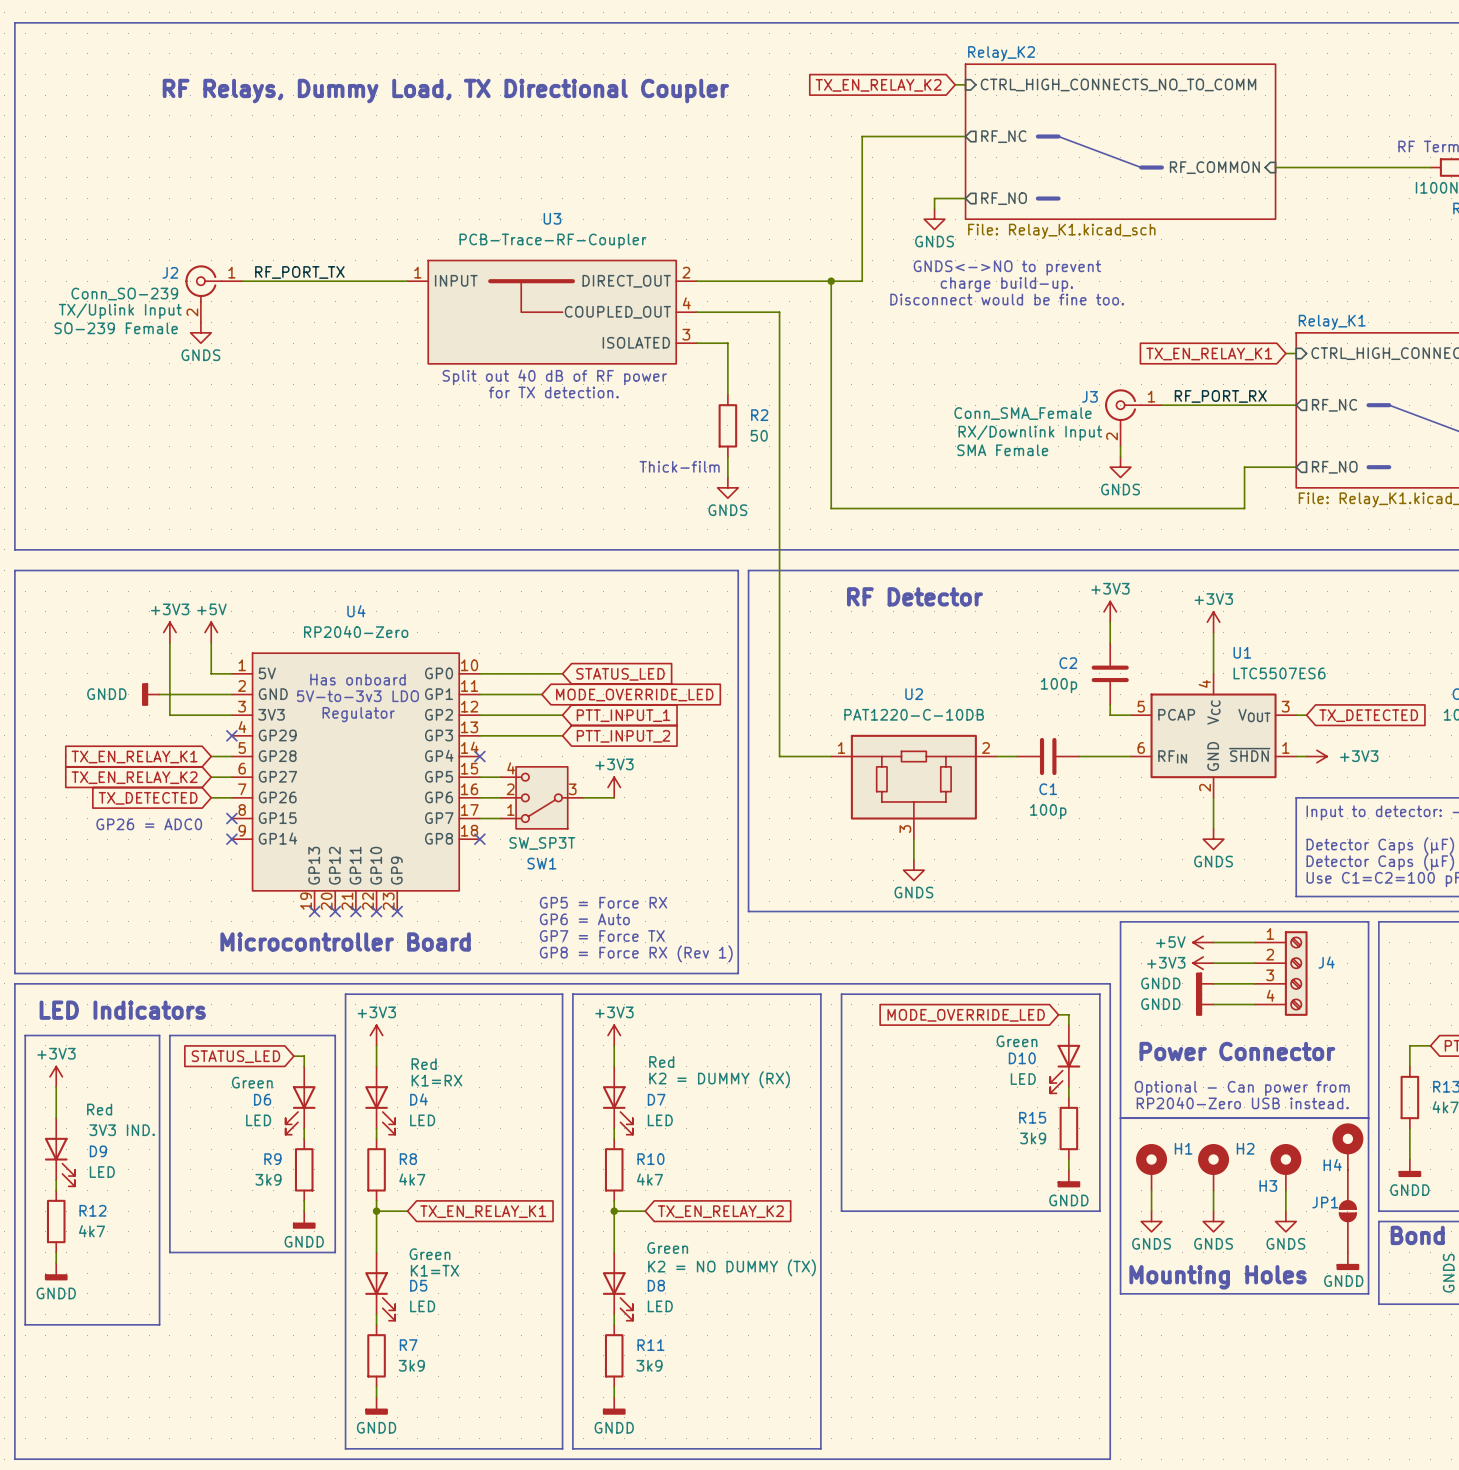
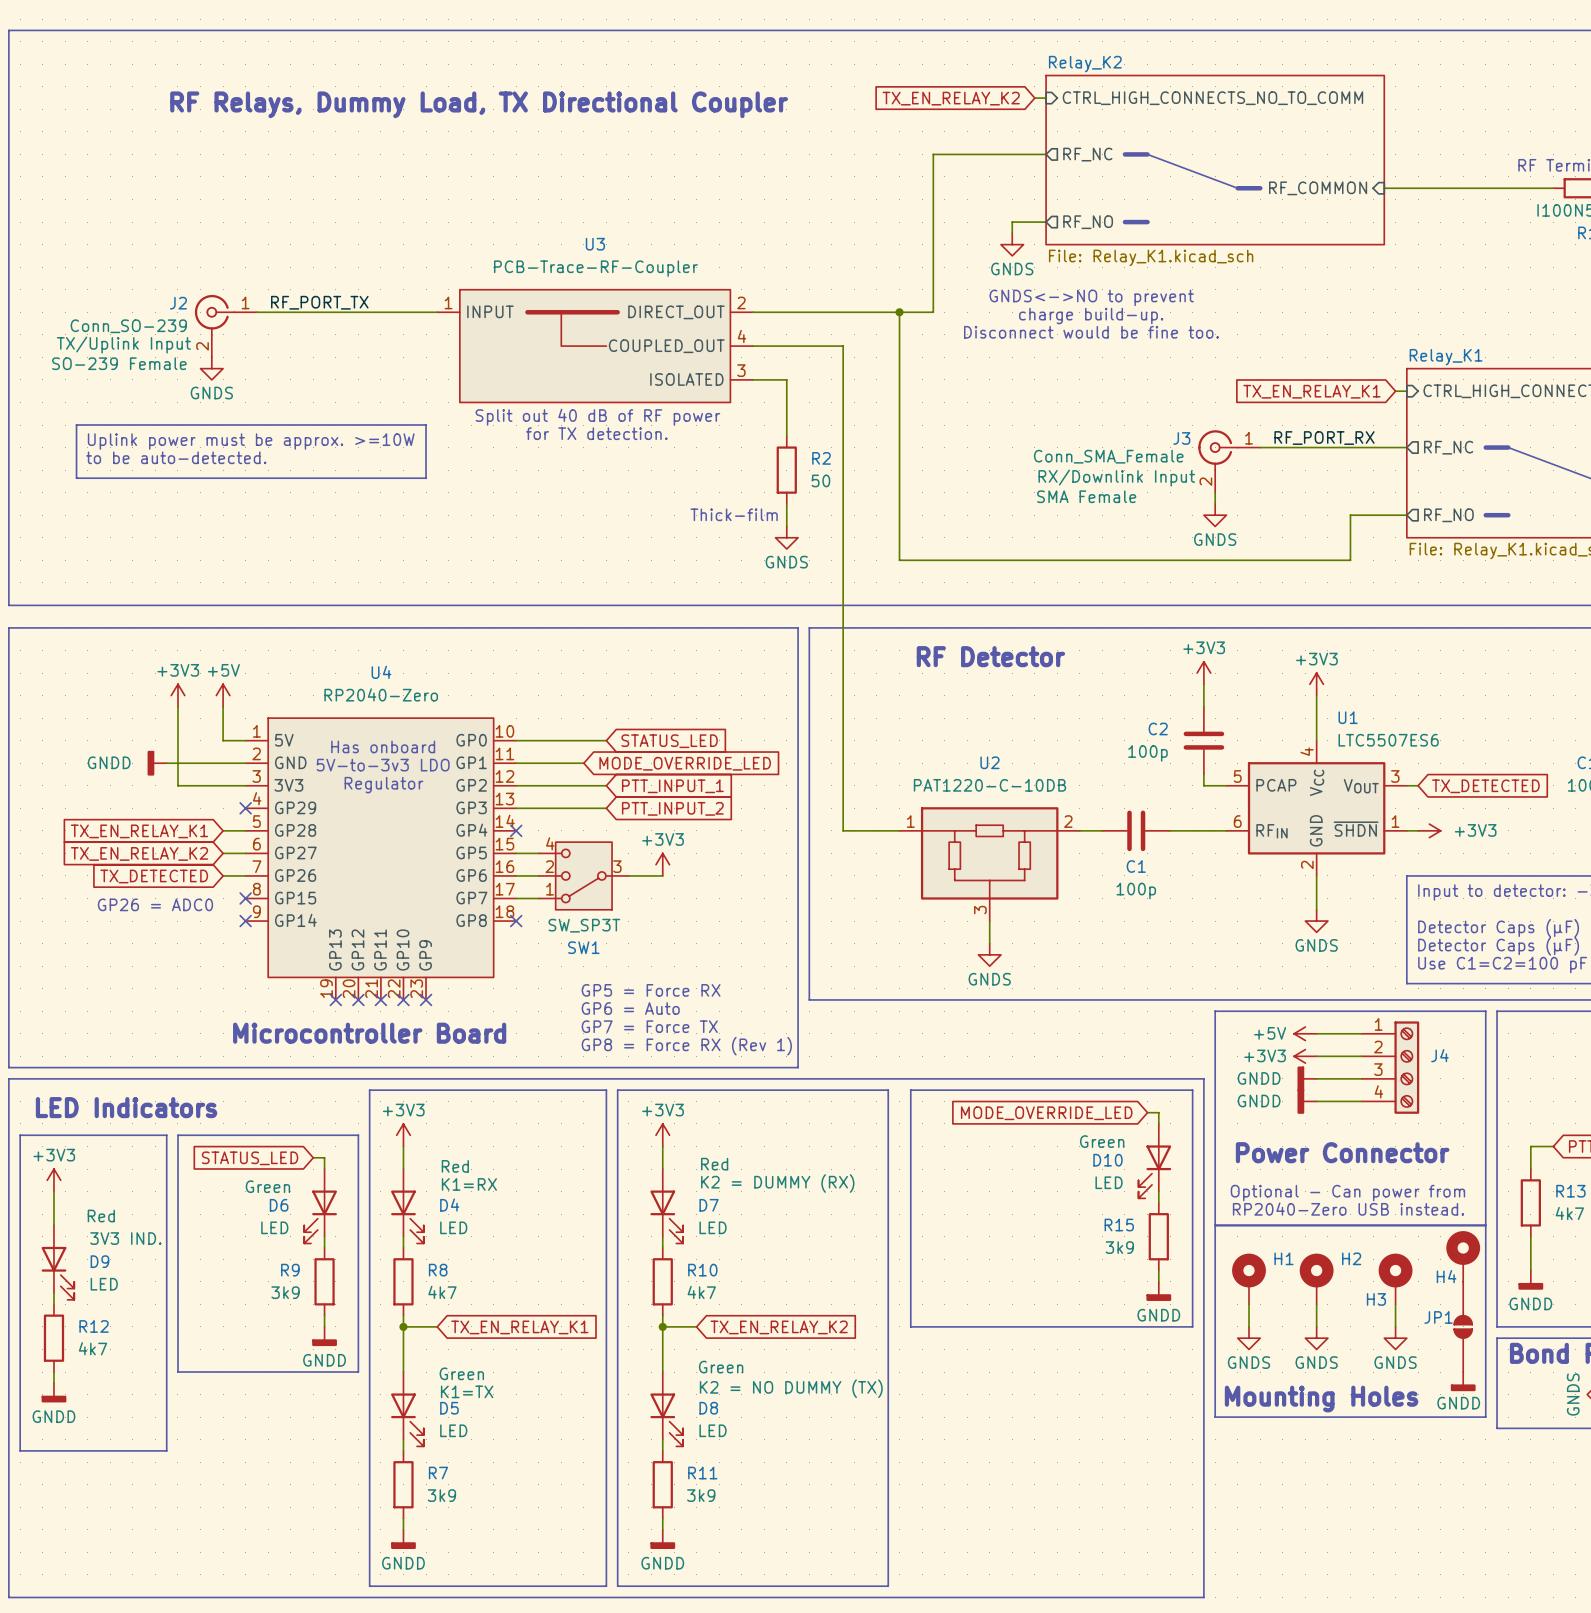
line: none -> (76, 425) (426, 425) (426, 478) (76, 478) (76, 425)
text: none -> Uplink power must be approx. >=10W (251, 441)
text: none -> to be auto-detected. (176, 457)

